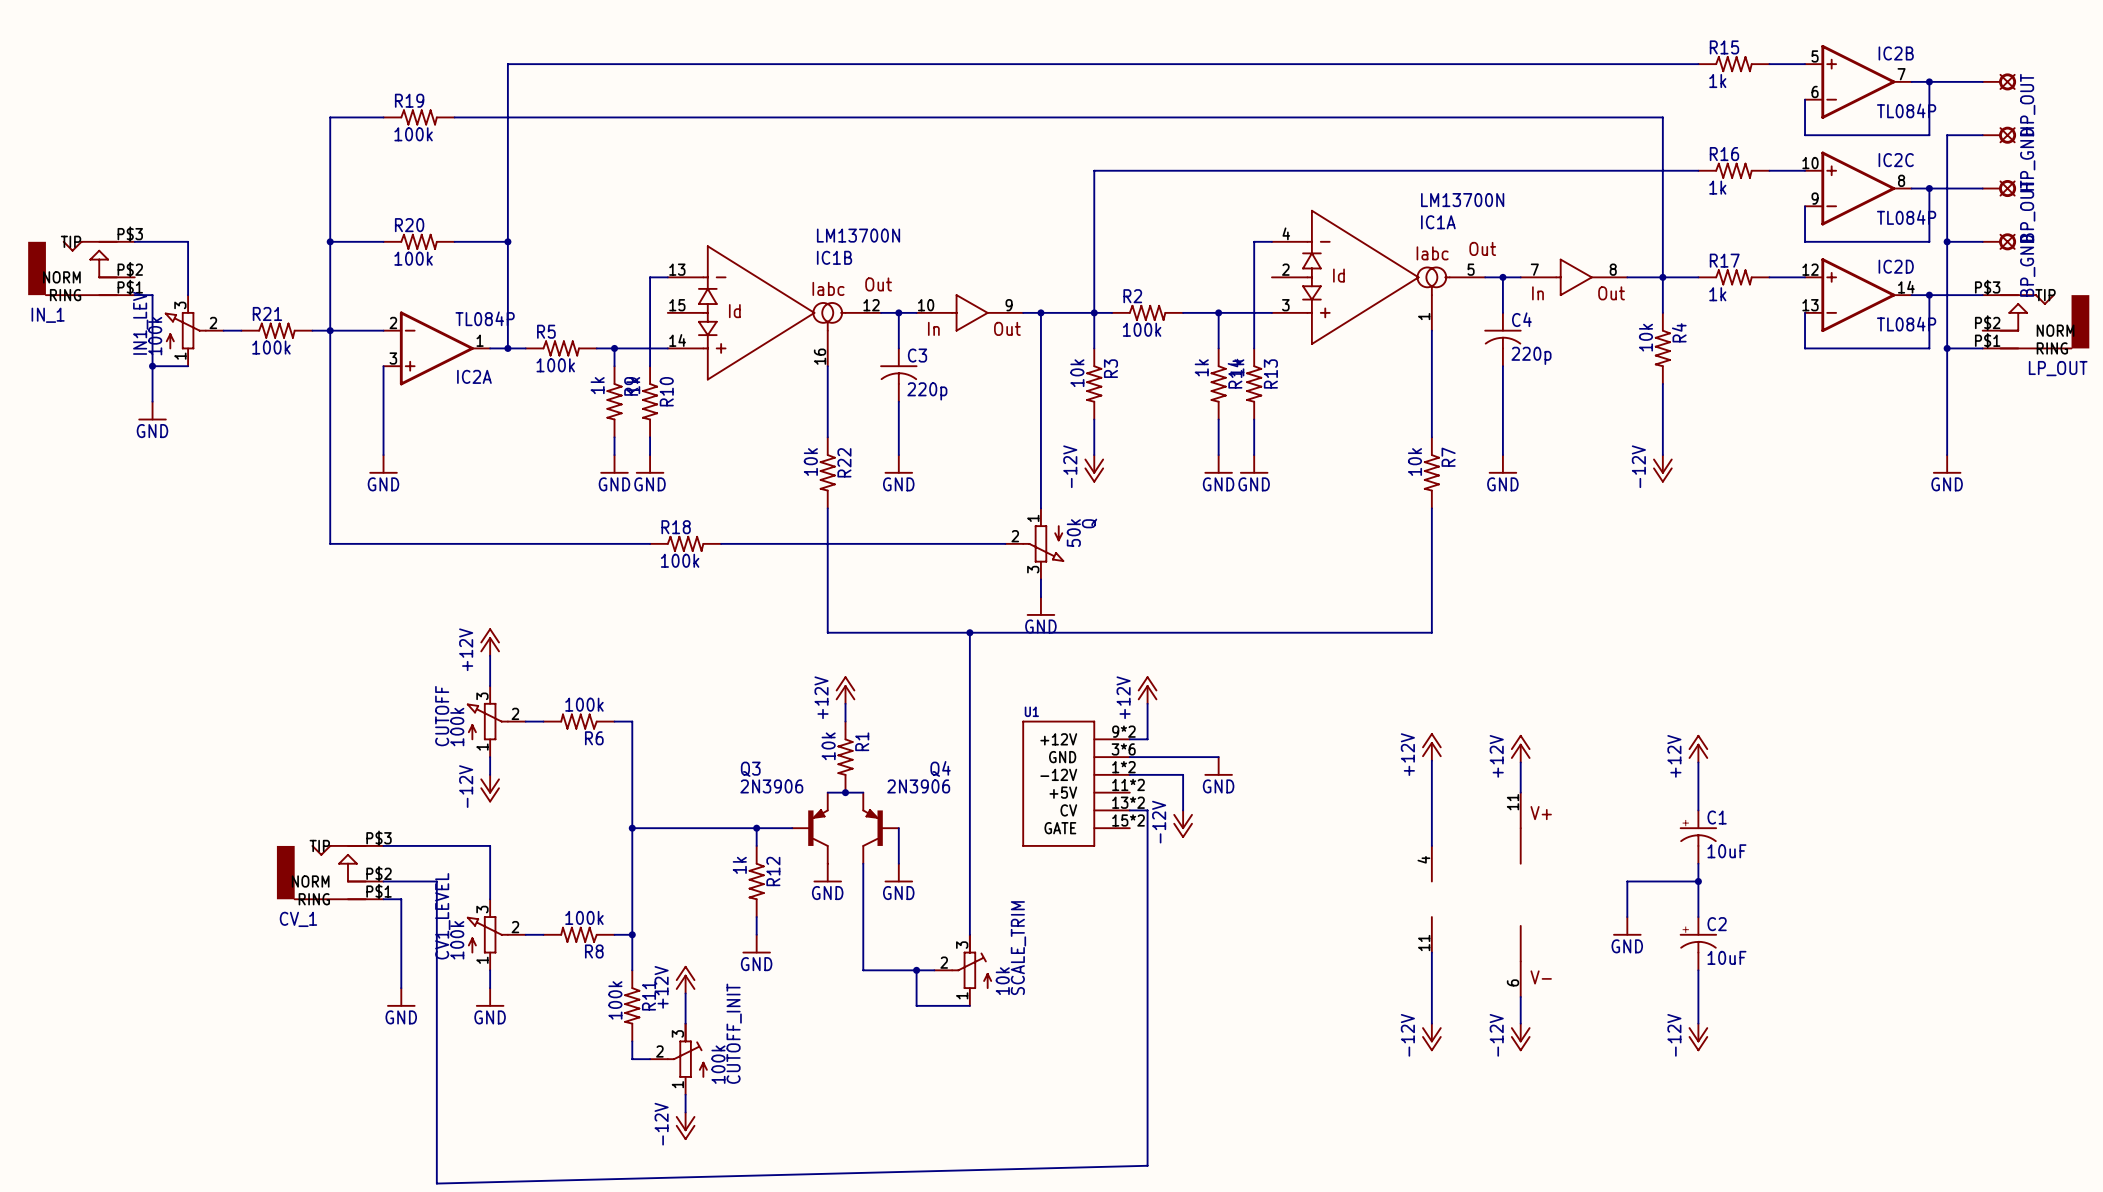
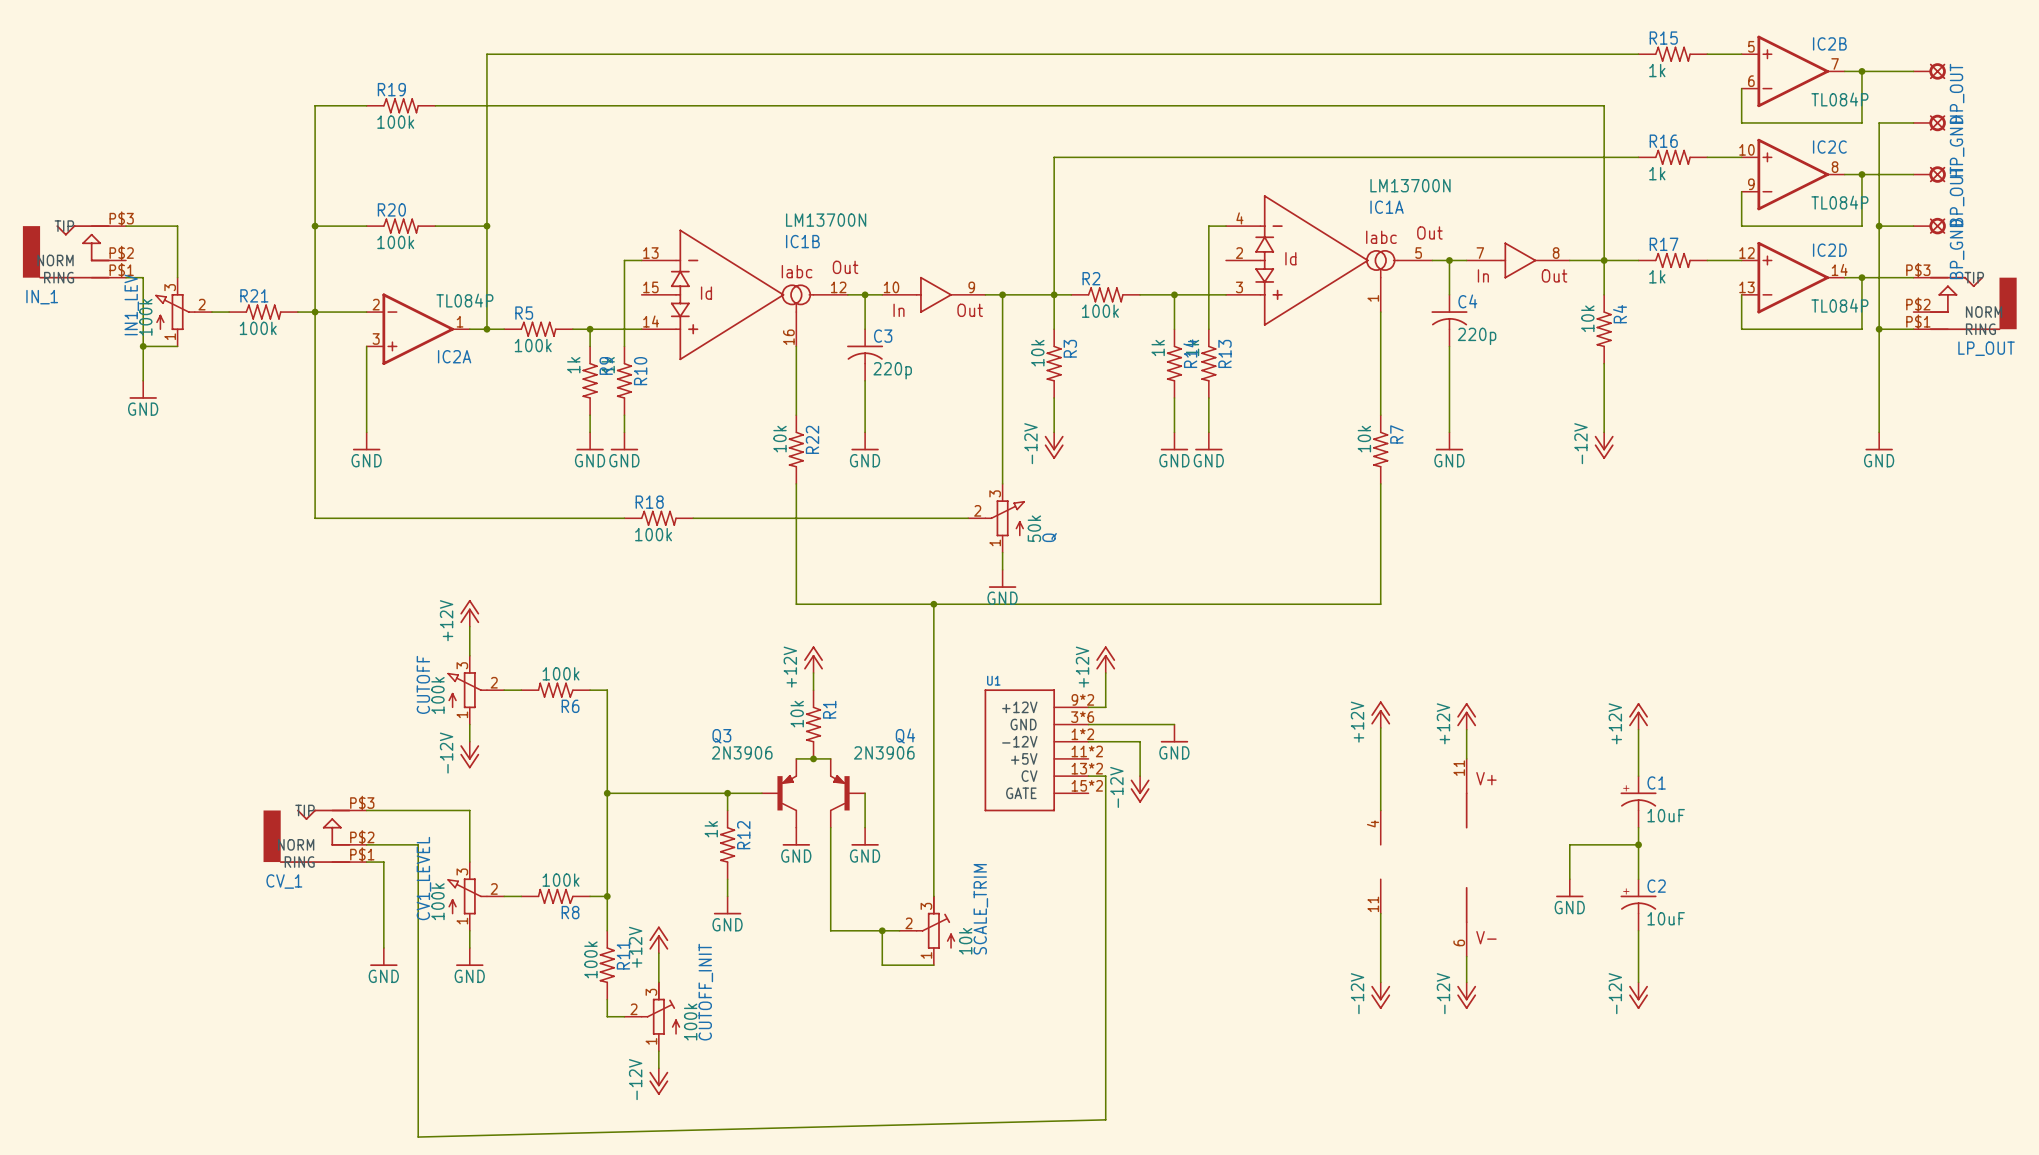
Q flip: as is (1043, 543) -> up-down (1004, 518)

